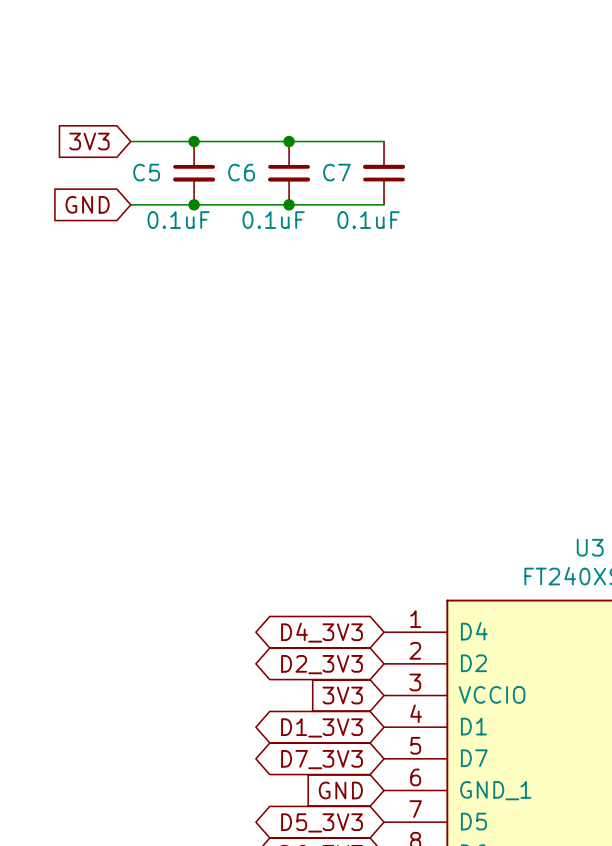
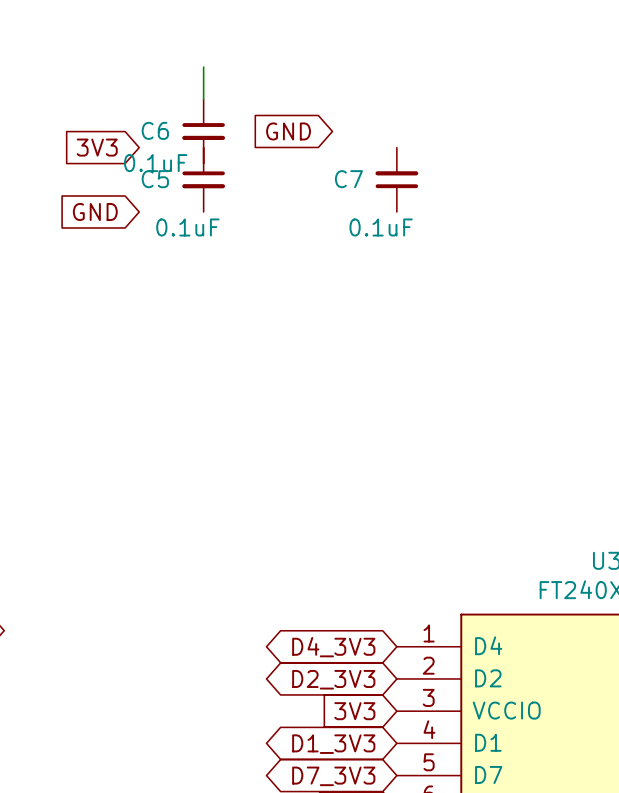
wire: none -> (203, 67) (203, 99)
global label: none -> GND (288, 131)
wire: (130, 141) (384, 141) -> none
junction: (194, 141) -> none
junction: (289, 141) -> none
C6 position: (289, 173) -> (203, 131)
wire: (130, 204) (384, 204) -> none
junction: (194, 204) -> none
junction: (289, 204) -> none
C6 value position: 0.1uF (273, 220) -> 0.1uF (155, 163)

